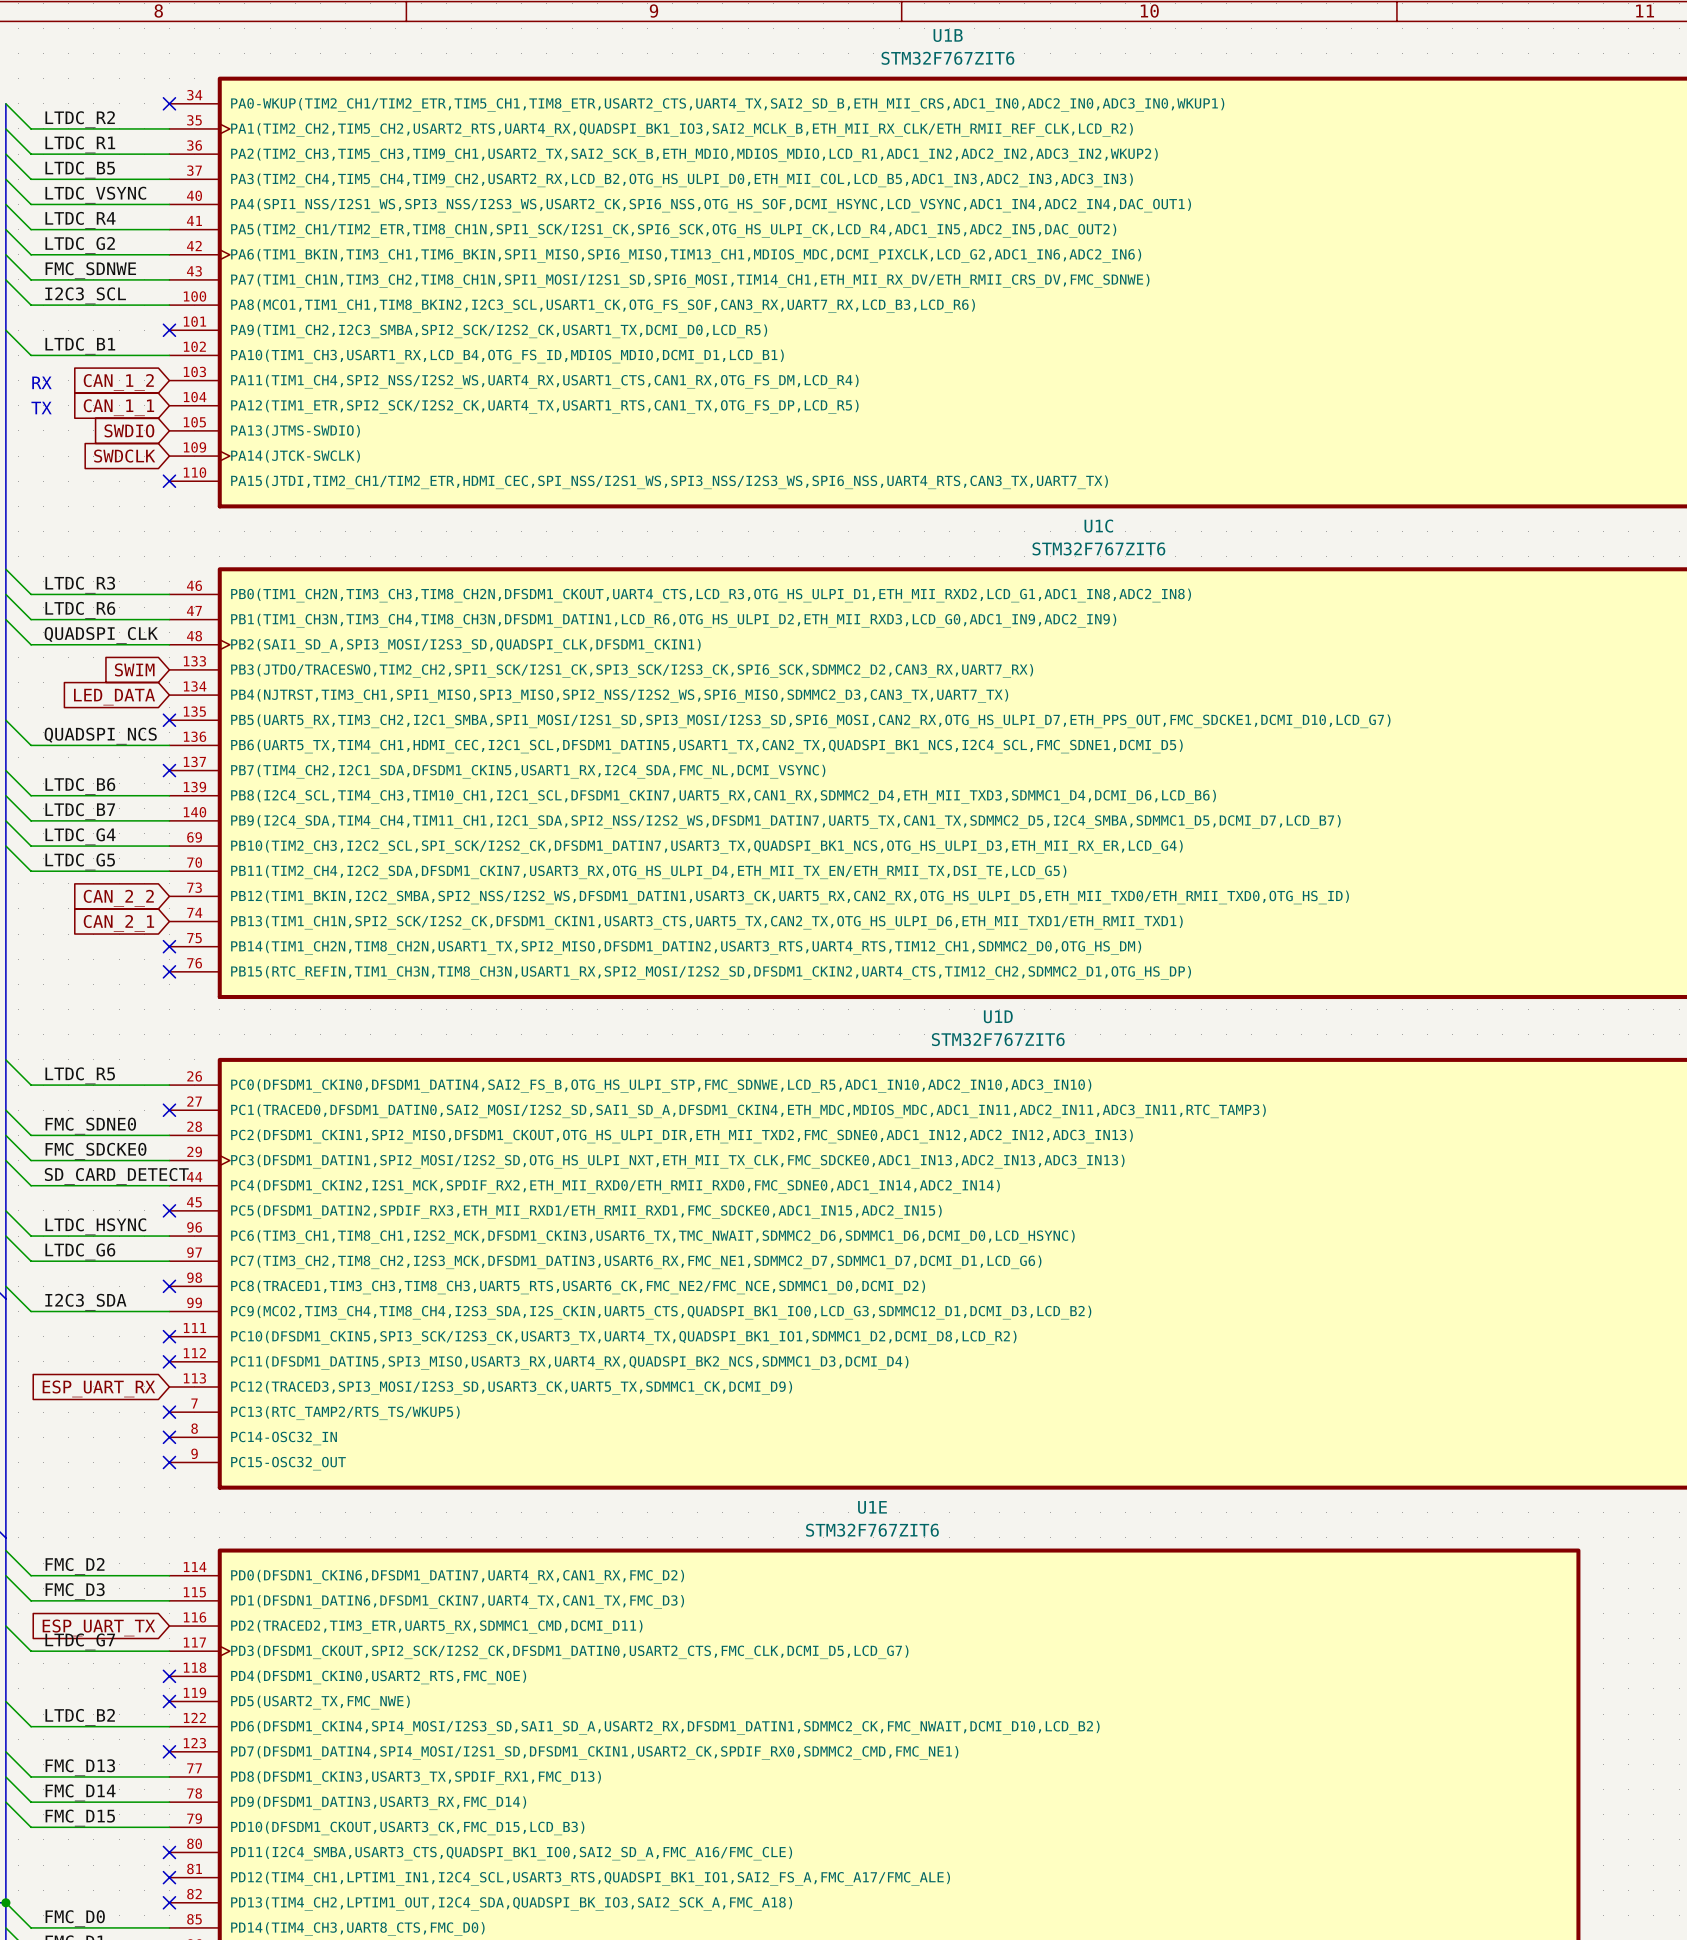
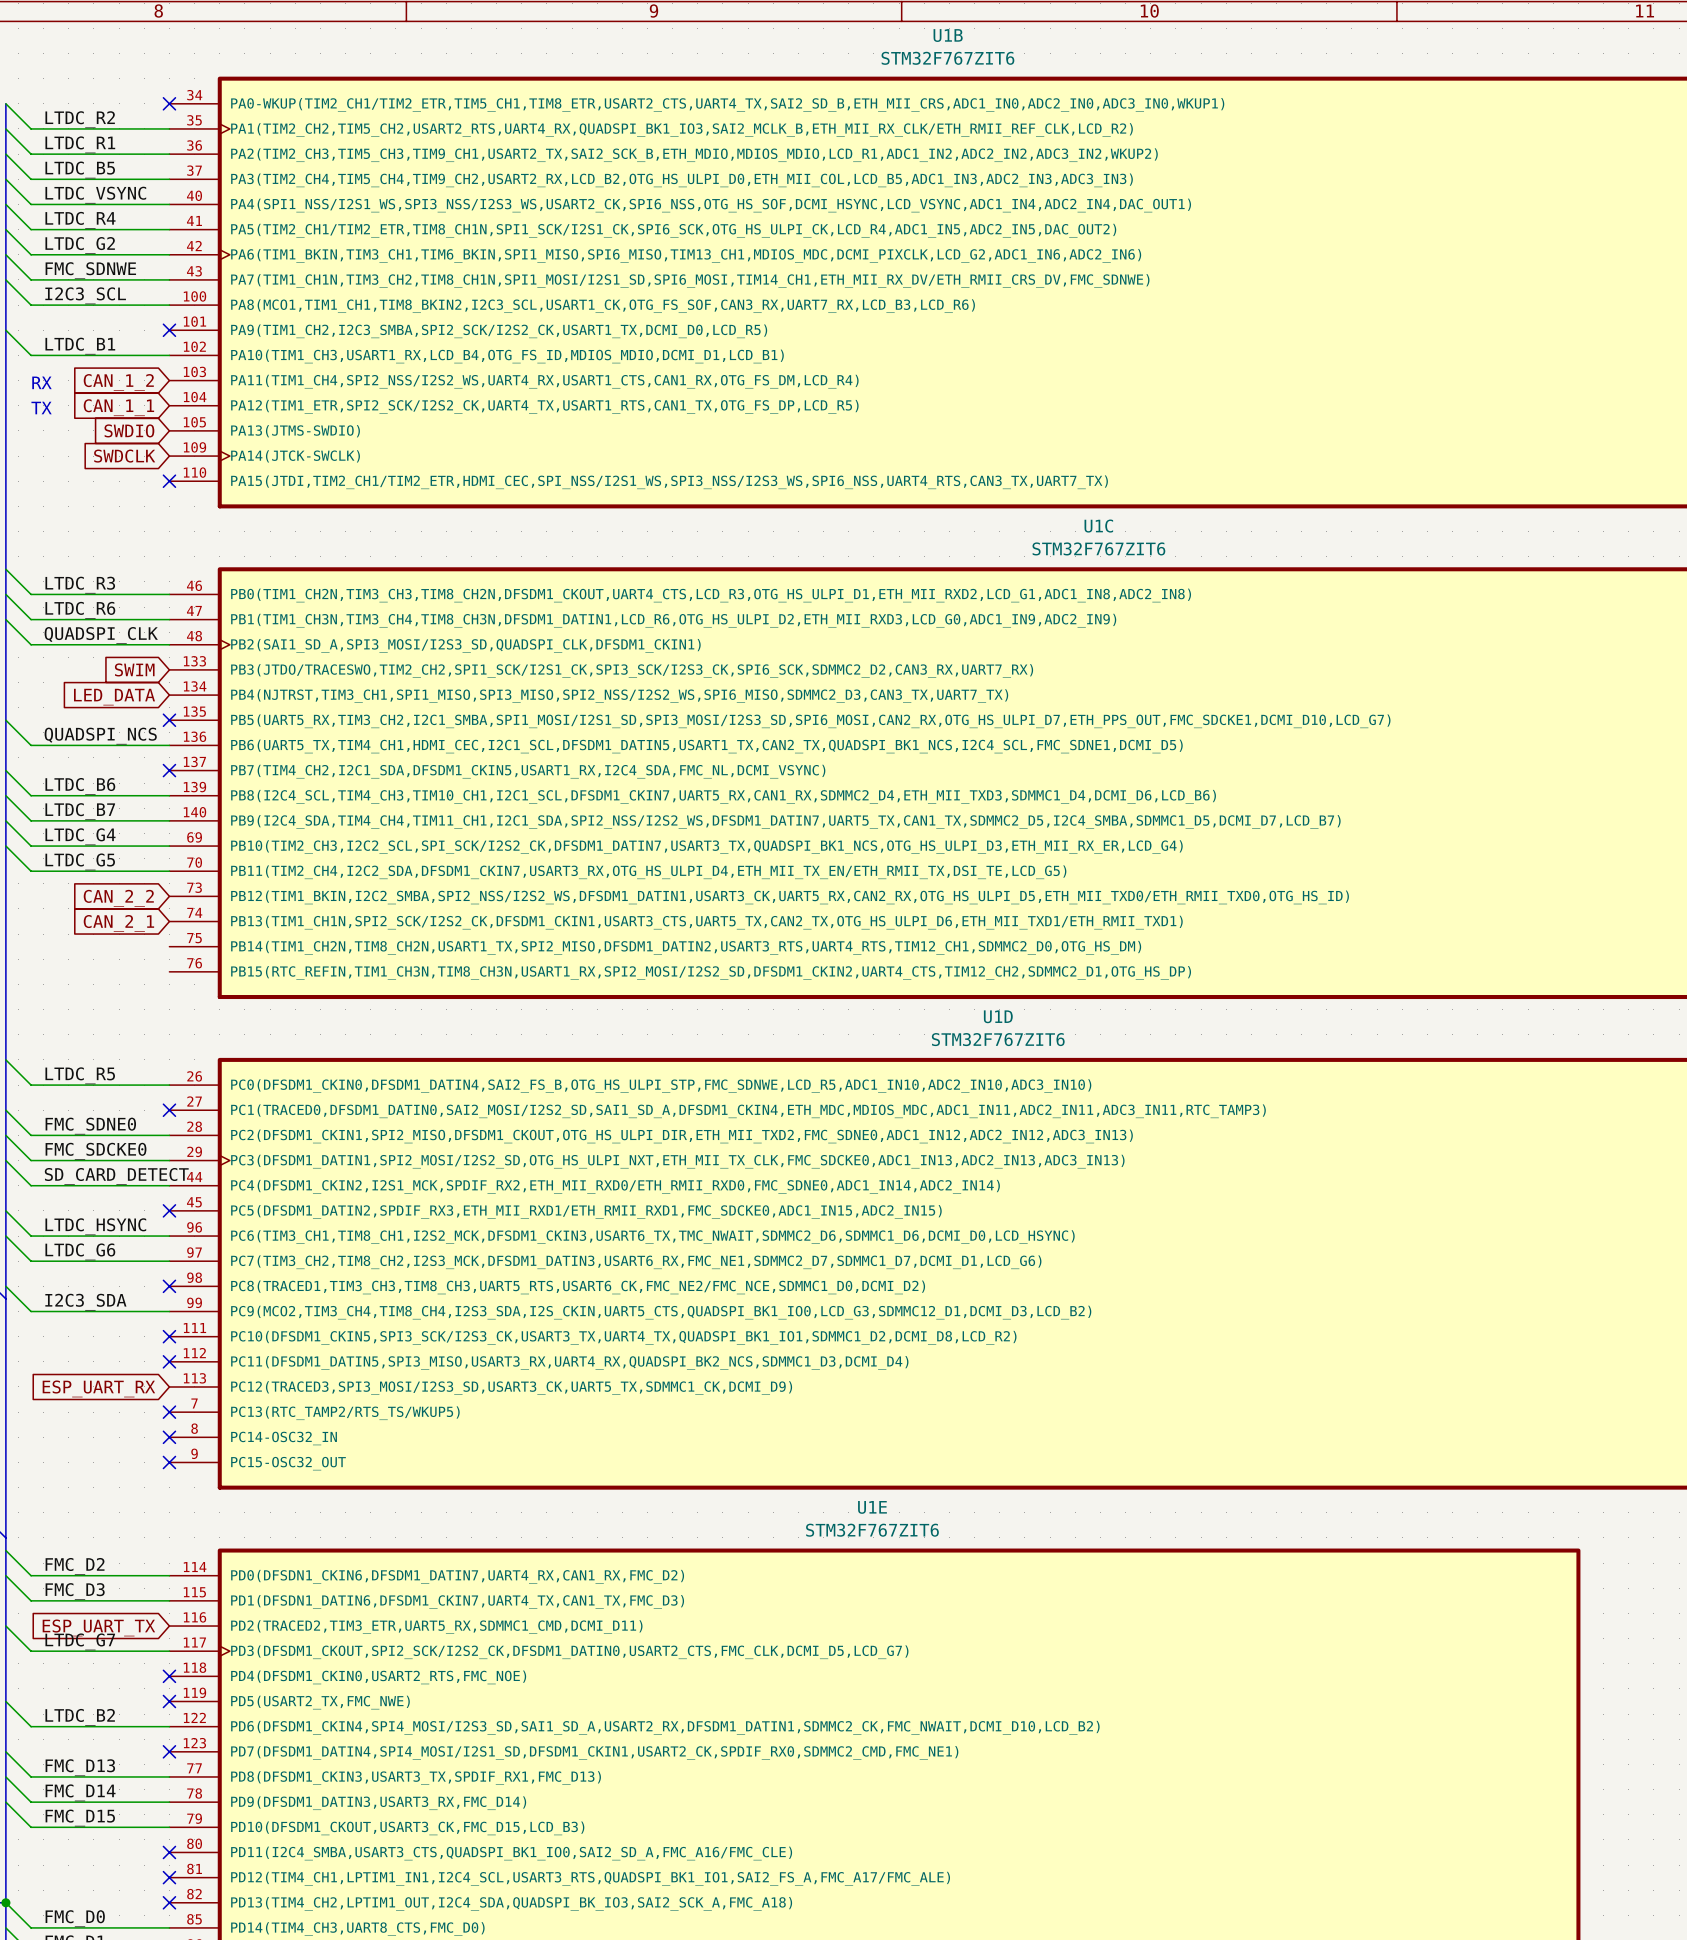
no-connect mark: (169, 946) -> none
no-connect mark: (169, 971) -> none

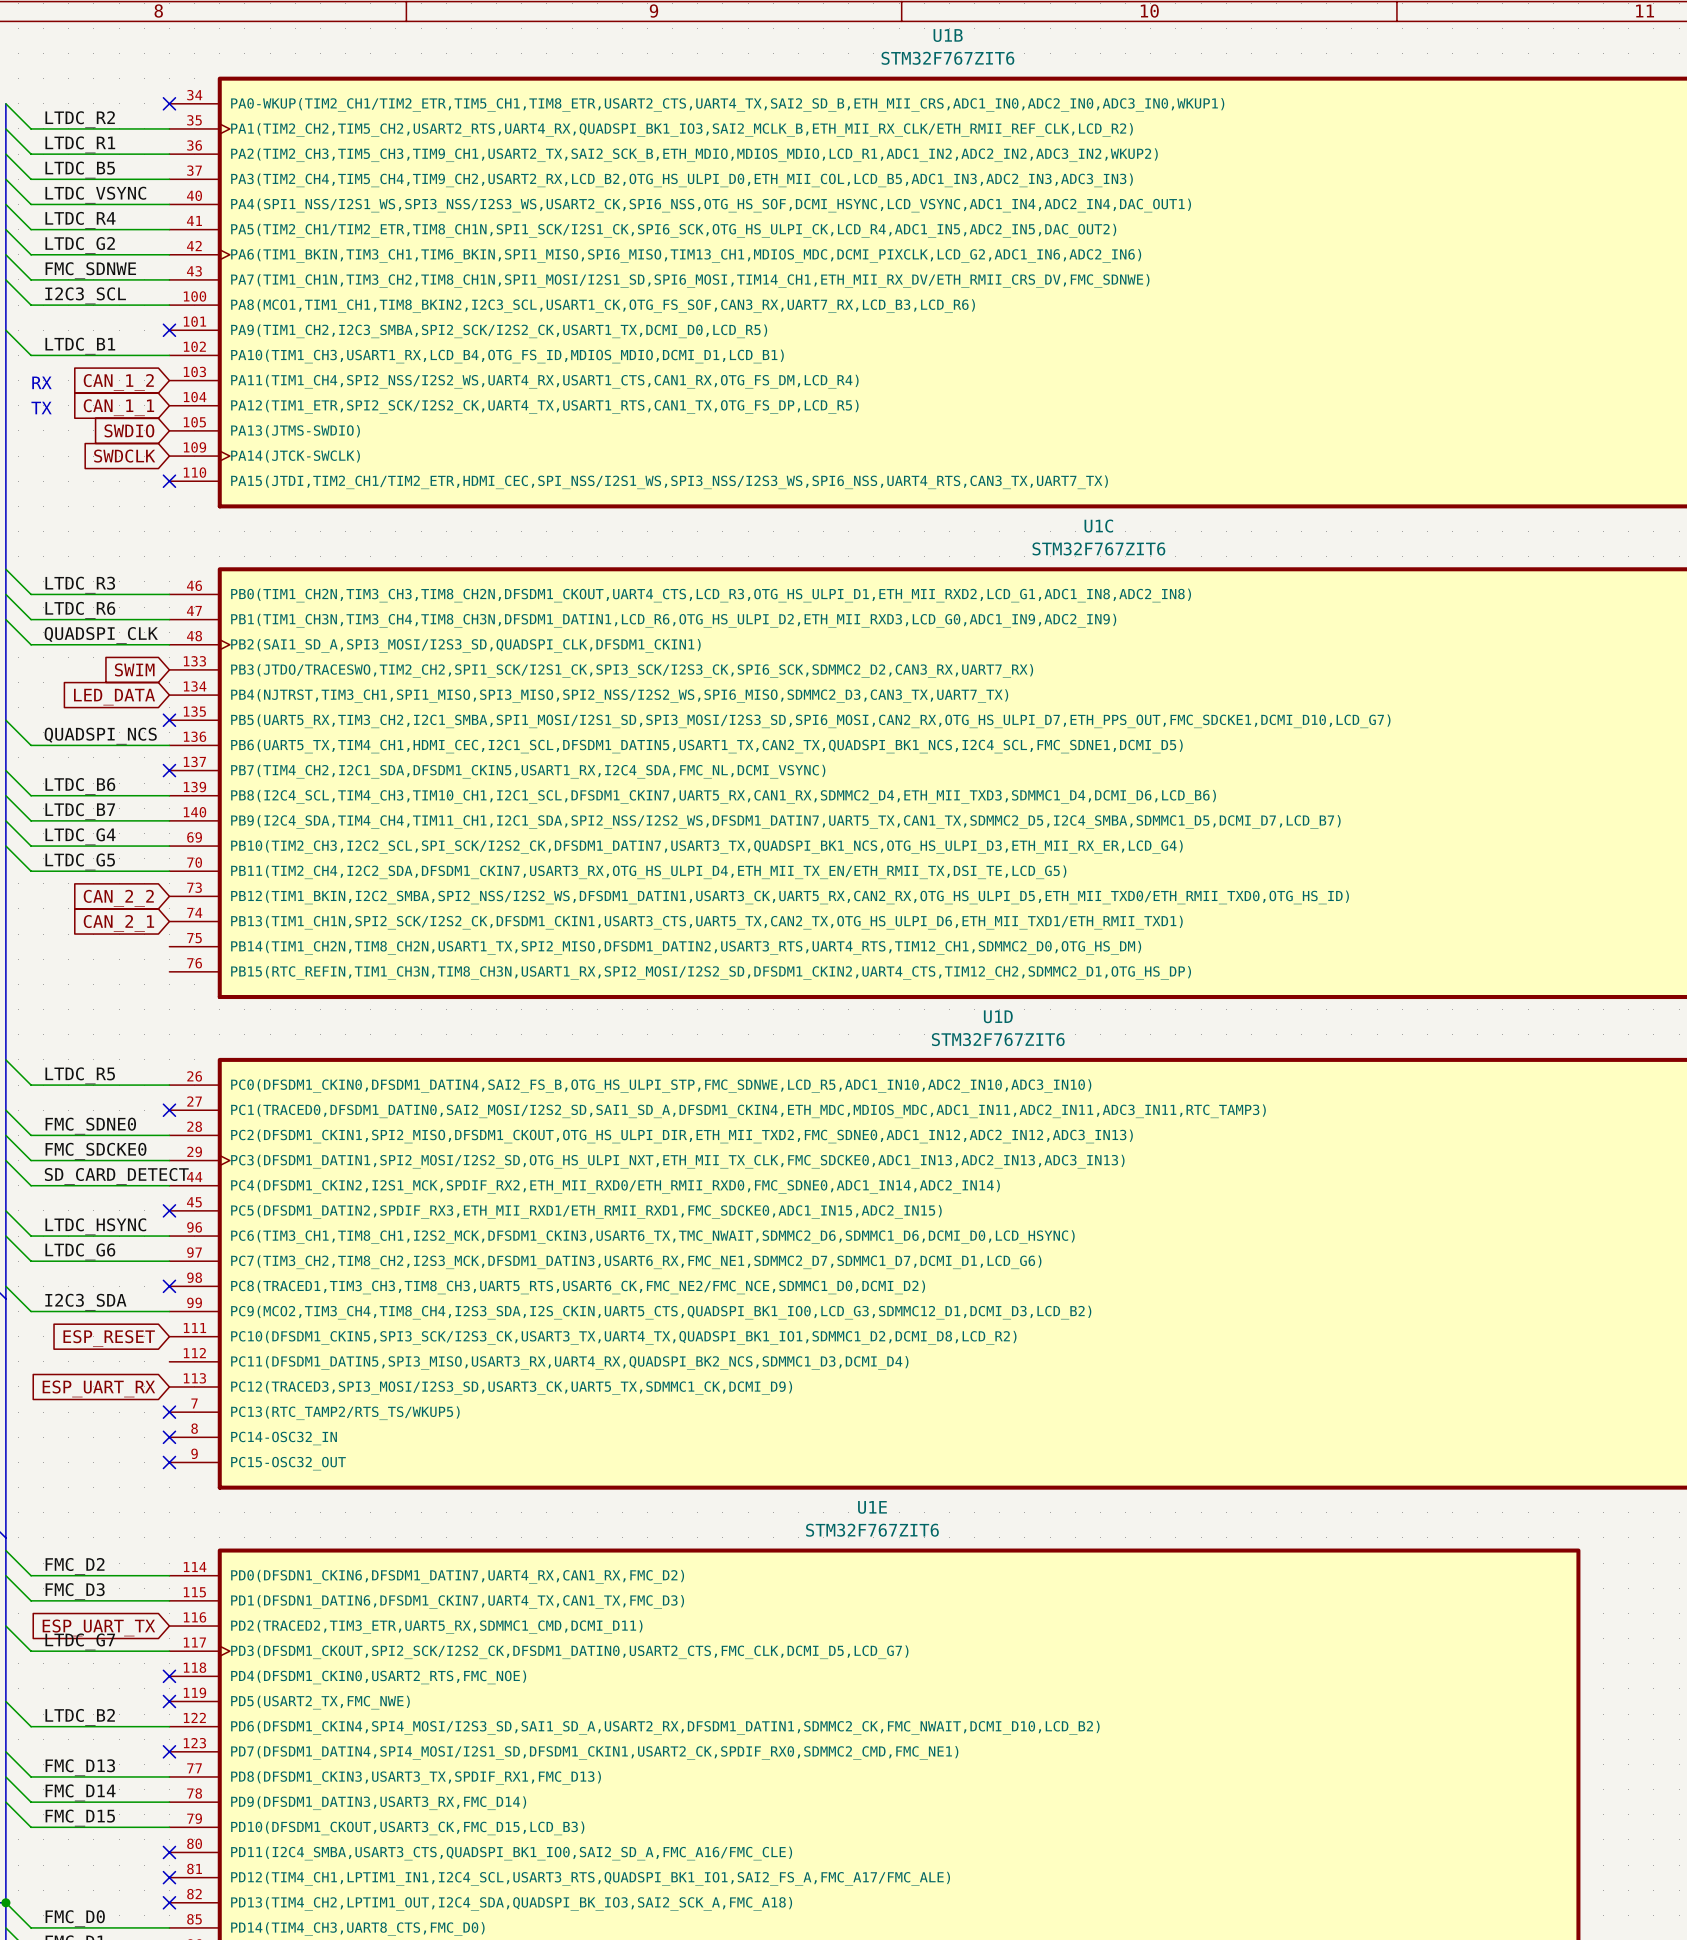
no-connect mark: (169, 1336) -> none
global label: none -> ESP_RESET (109, 1338)
no-connect mark: (169, 1361) -> none

